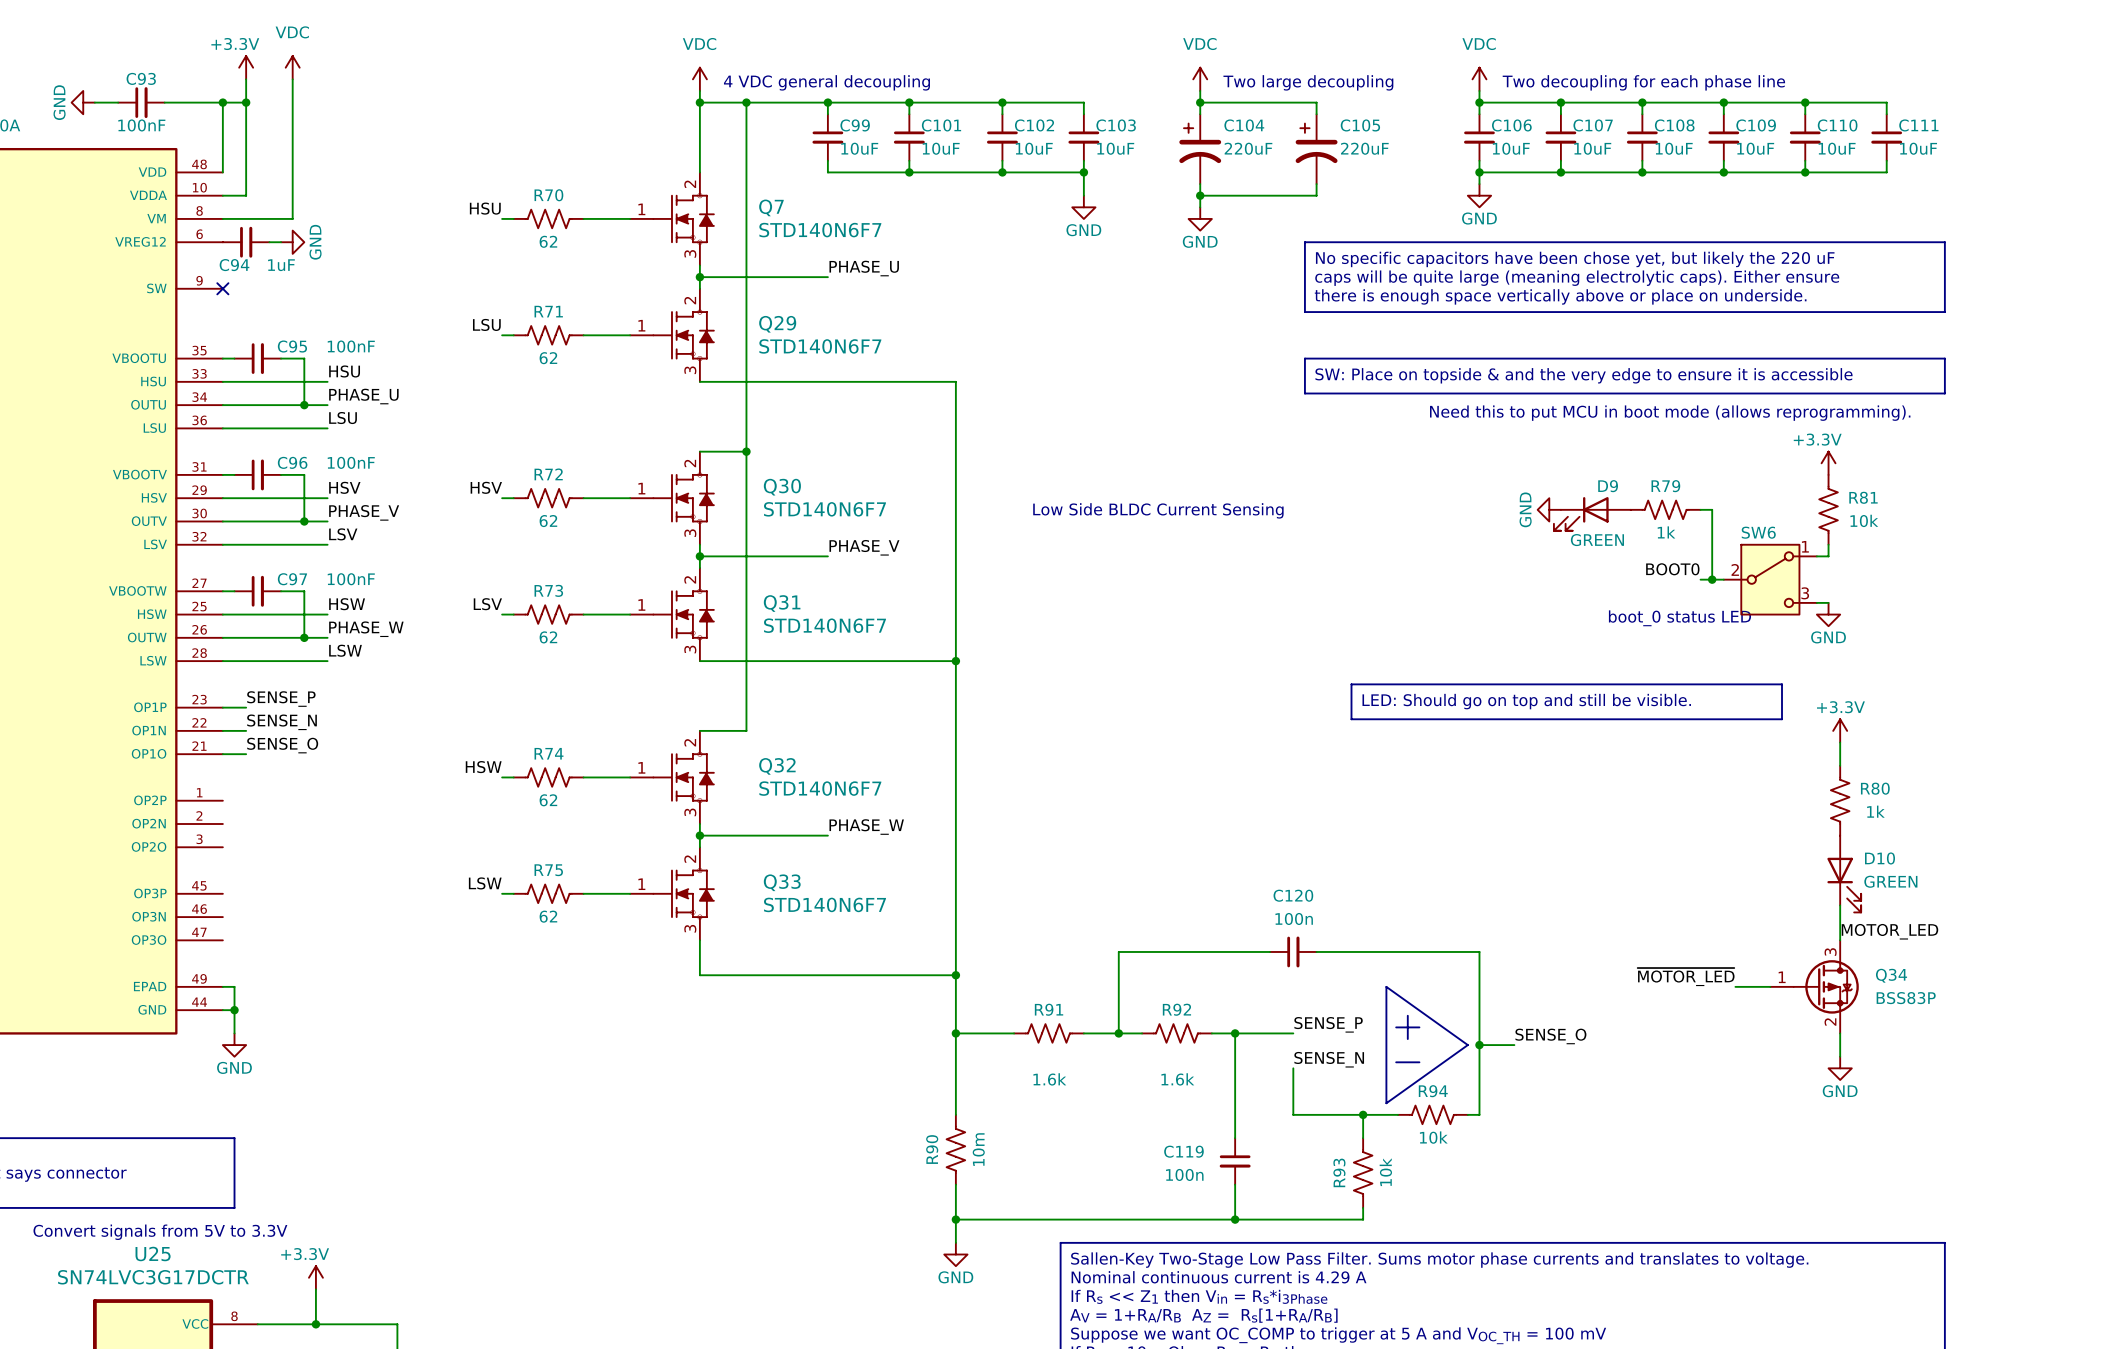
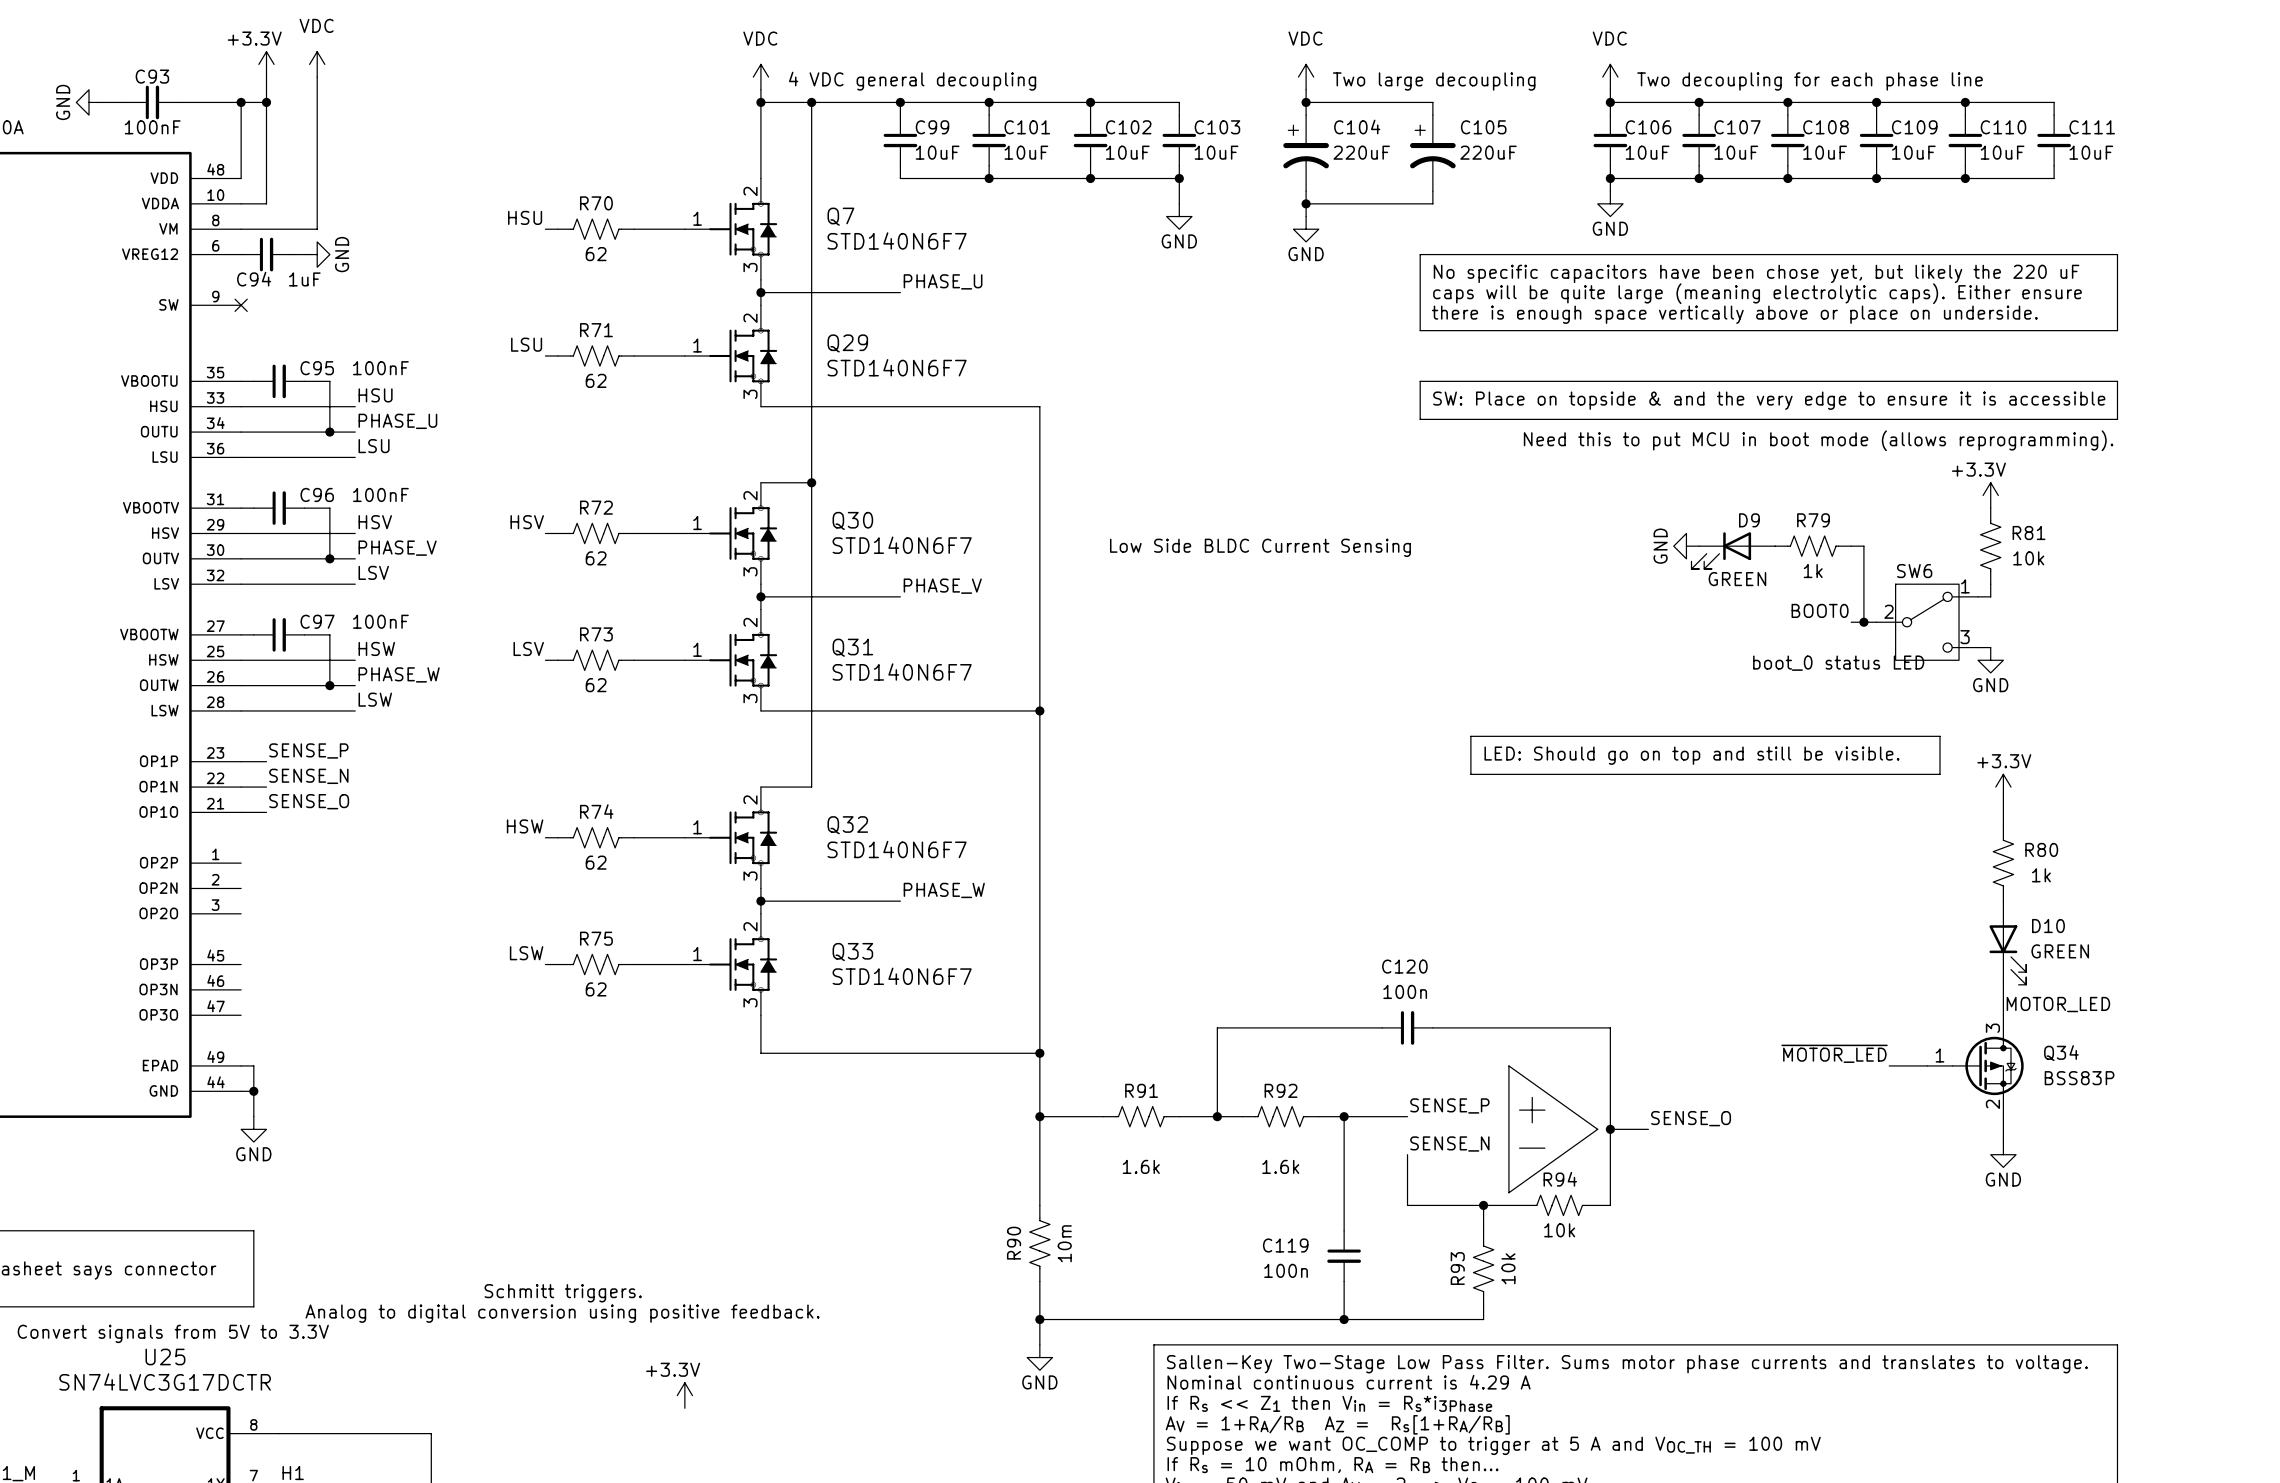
text: none -> Schmitt triggers. (563, 1293)
text: none -> Analog to digital conversion using positive feedback. (562, 1313)
power symbol: +3.3V (315, 1277) -> none
wire: (315, 1289) (315, 1324) -> none
power symbol: none -> +3.3V (684, 1395)
junction: (315, 1324) -> none

